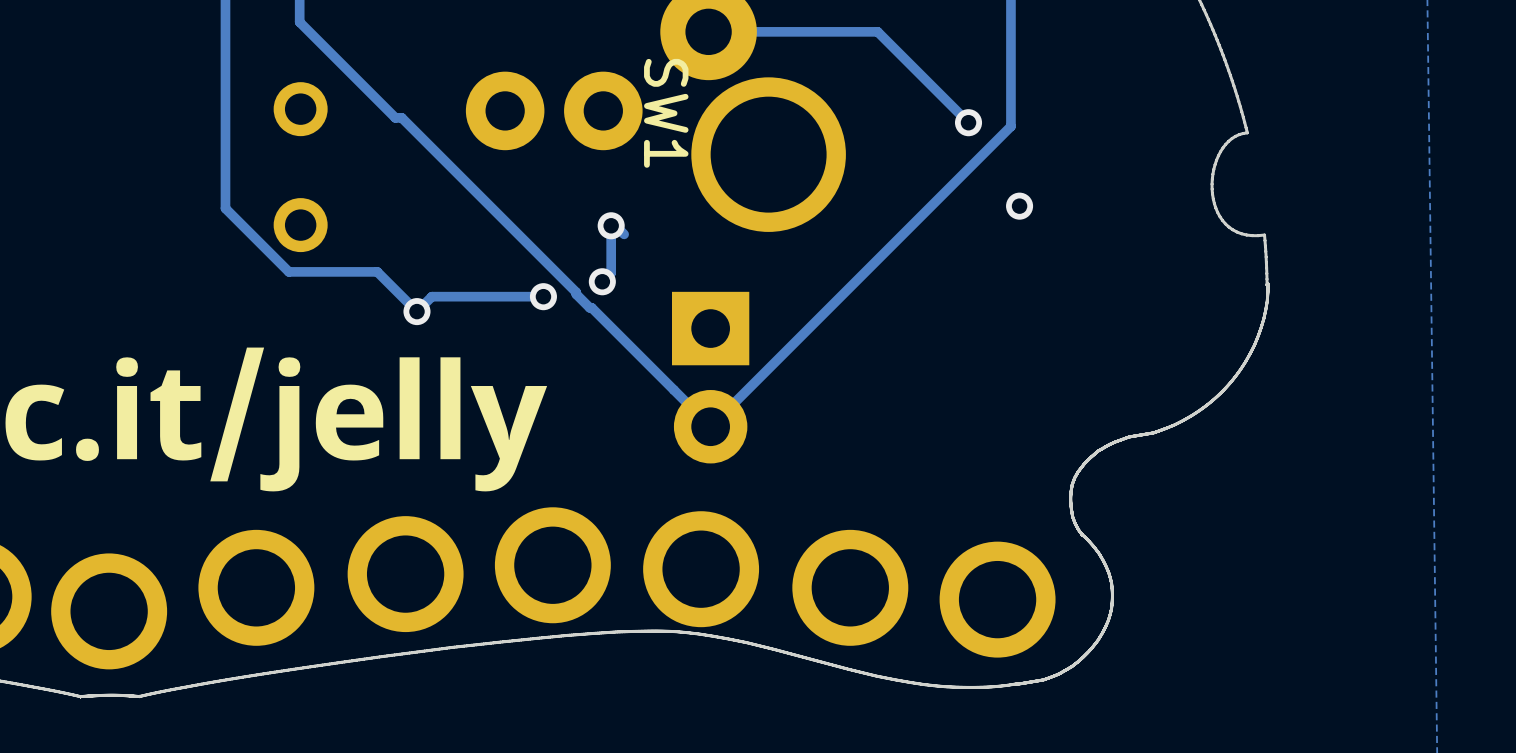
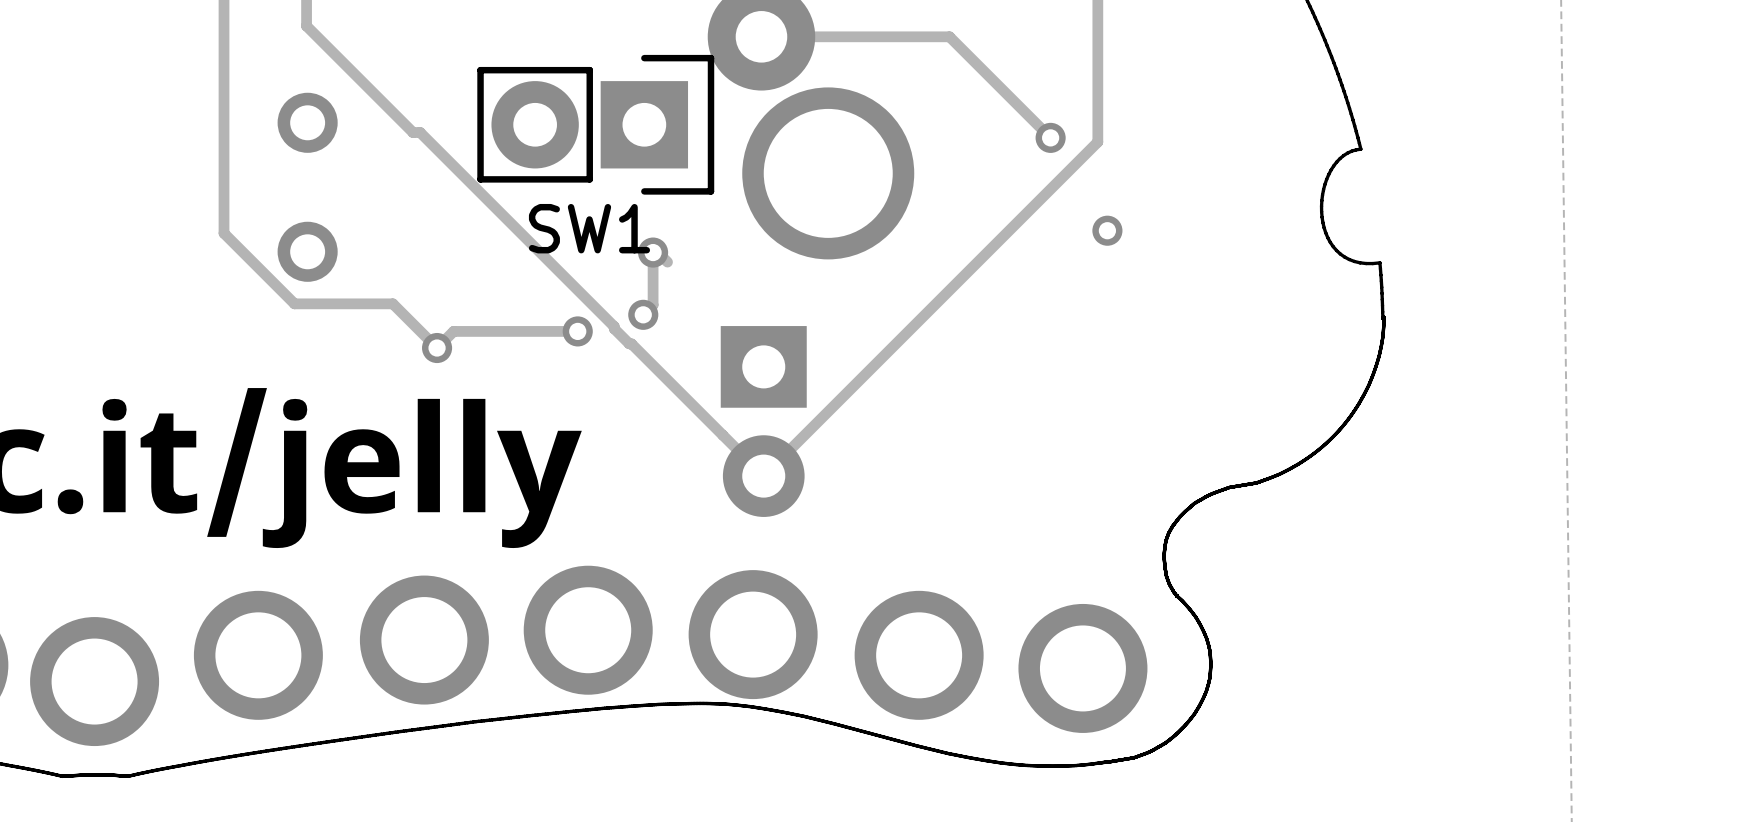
SW1 footprint: [465, 71, 643, 151] -> [477, 54, 715, 195]
SW1 name position: SW1 (666, 113) -> SW1 (589, 228)

